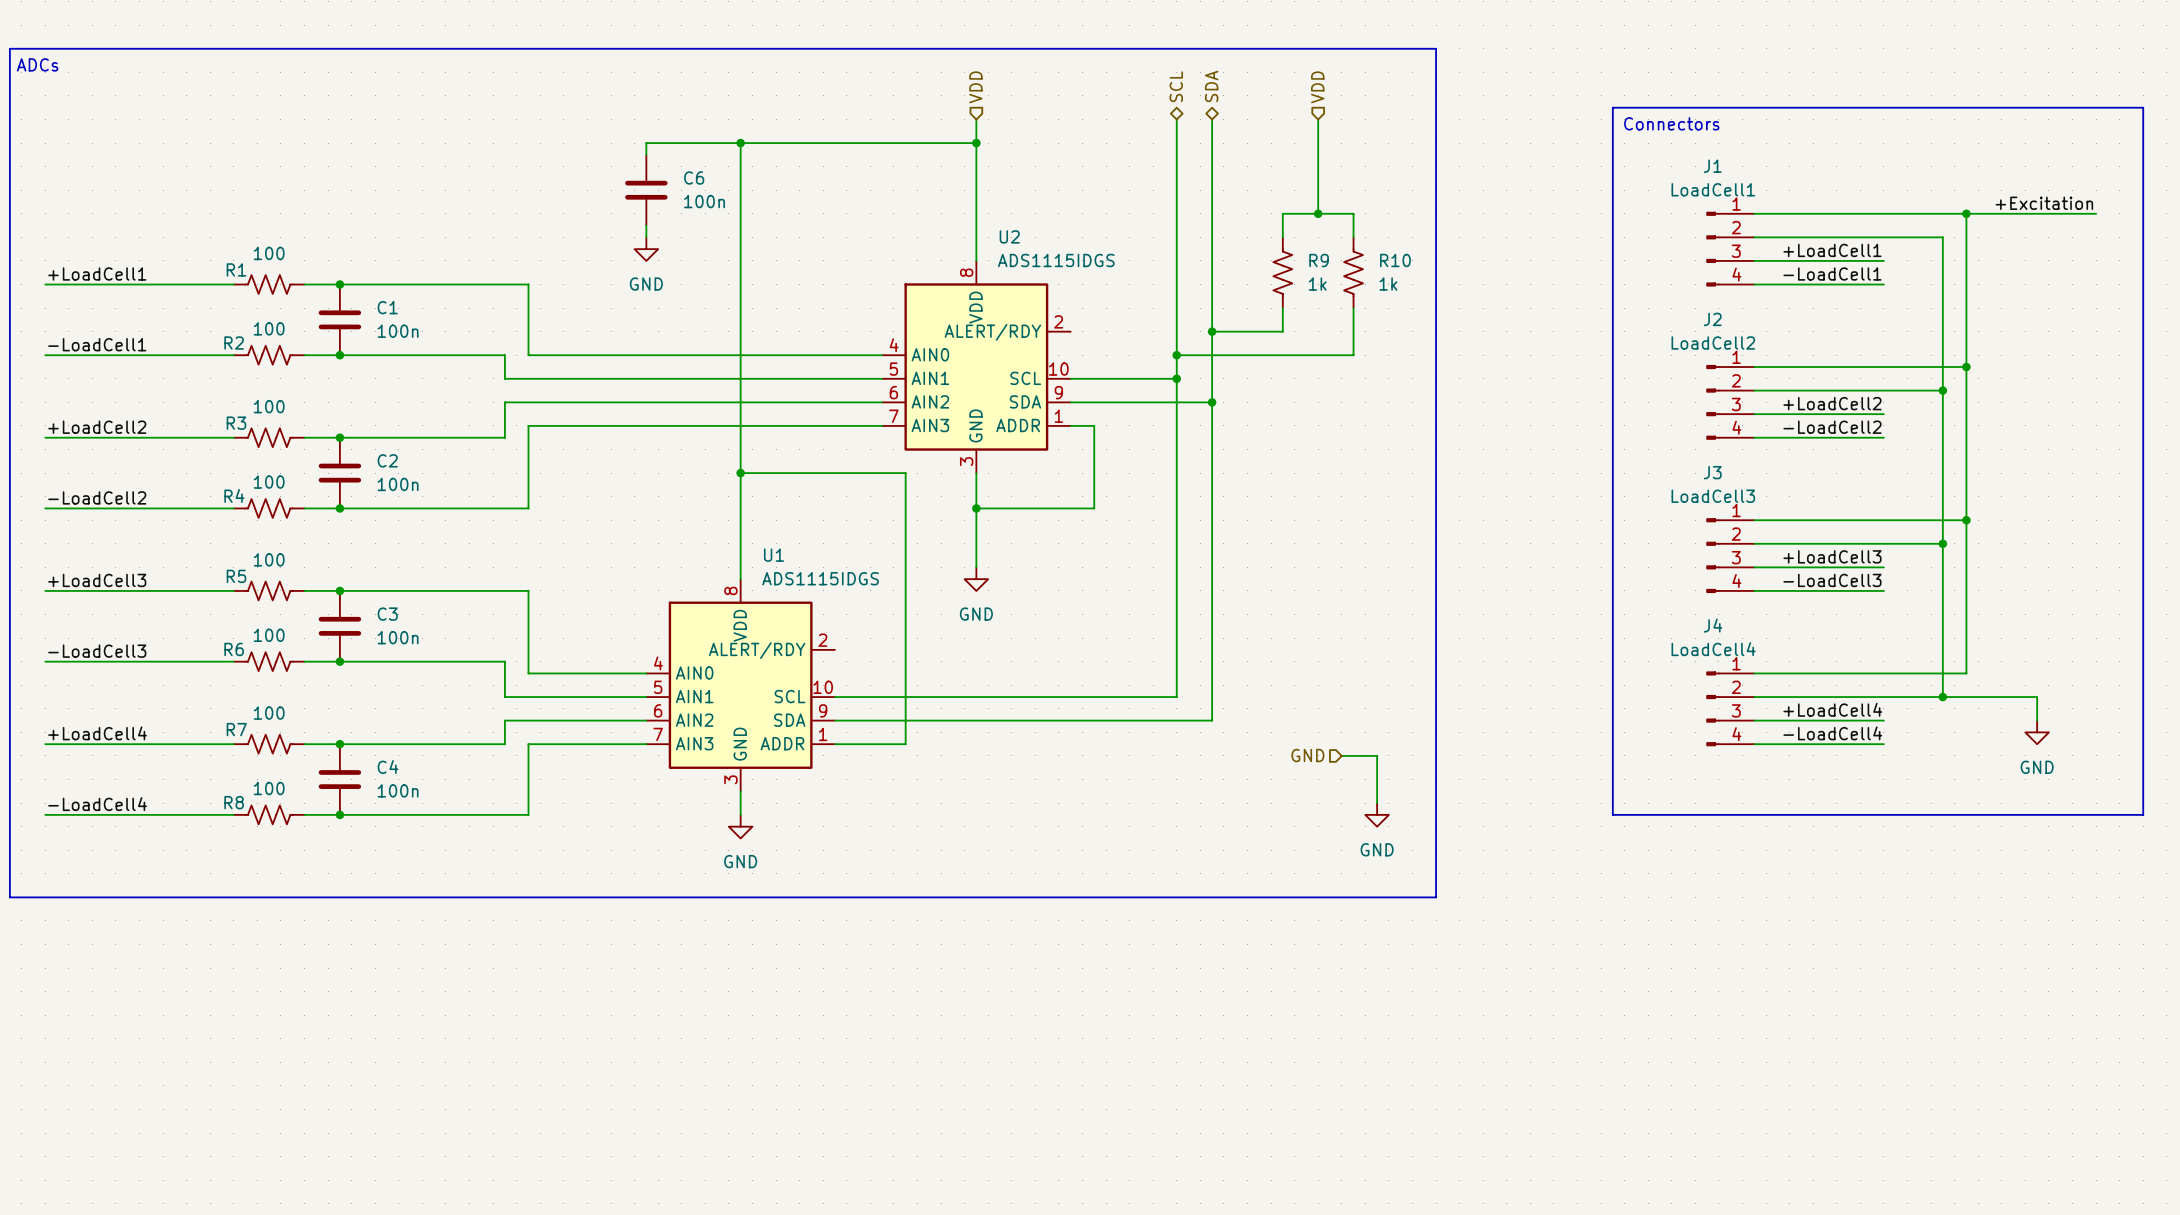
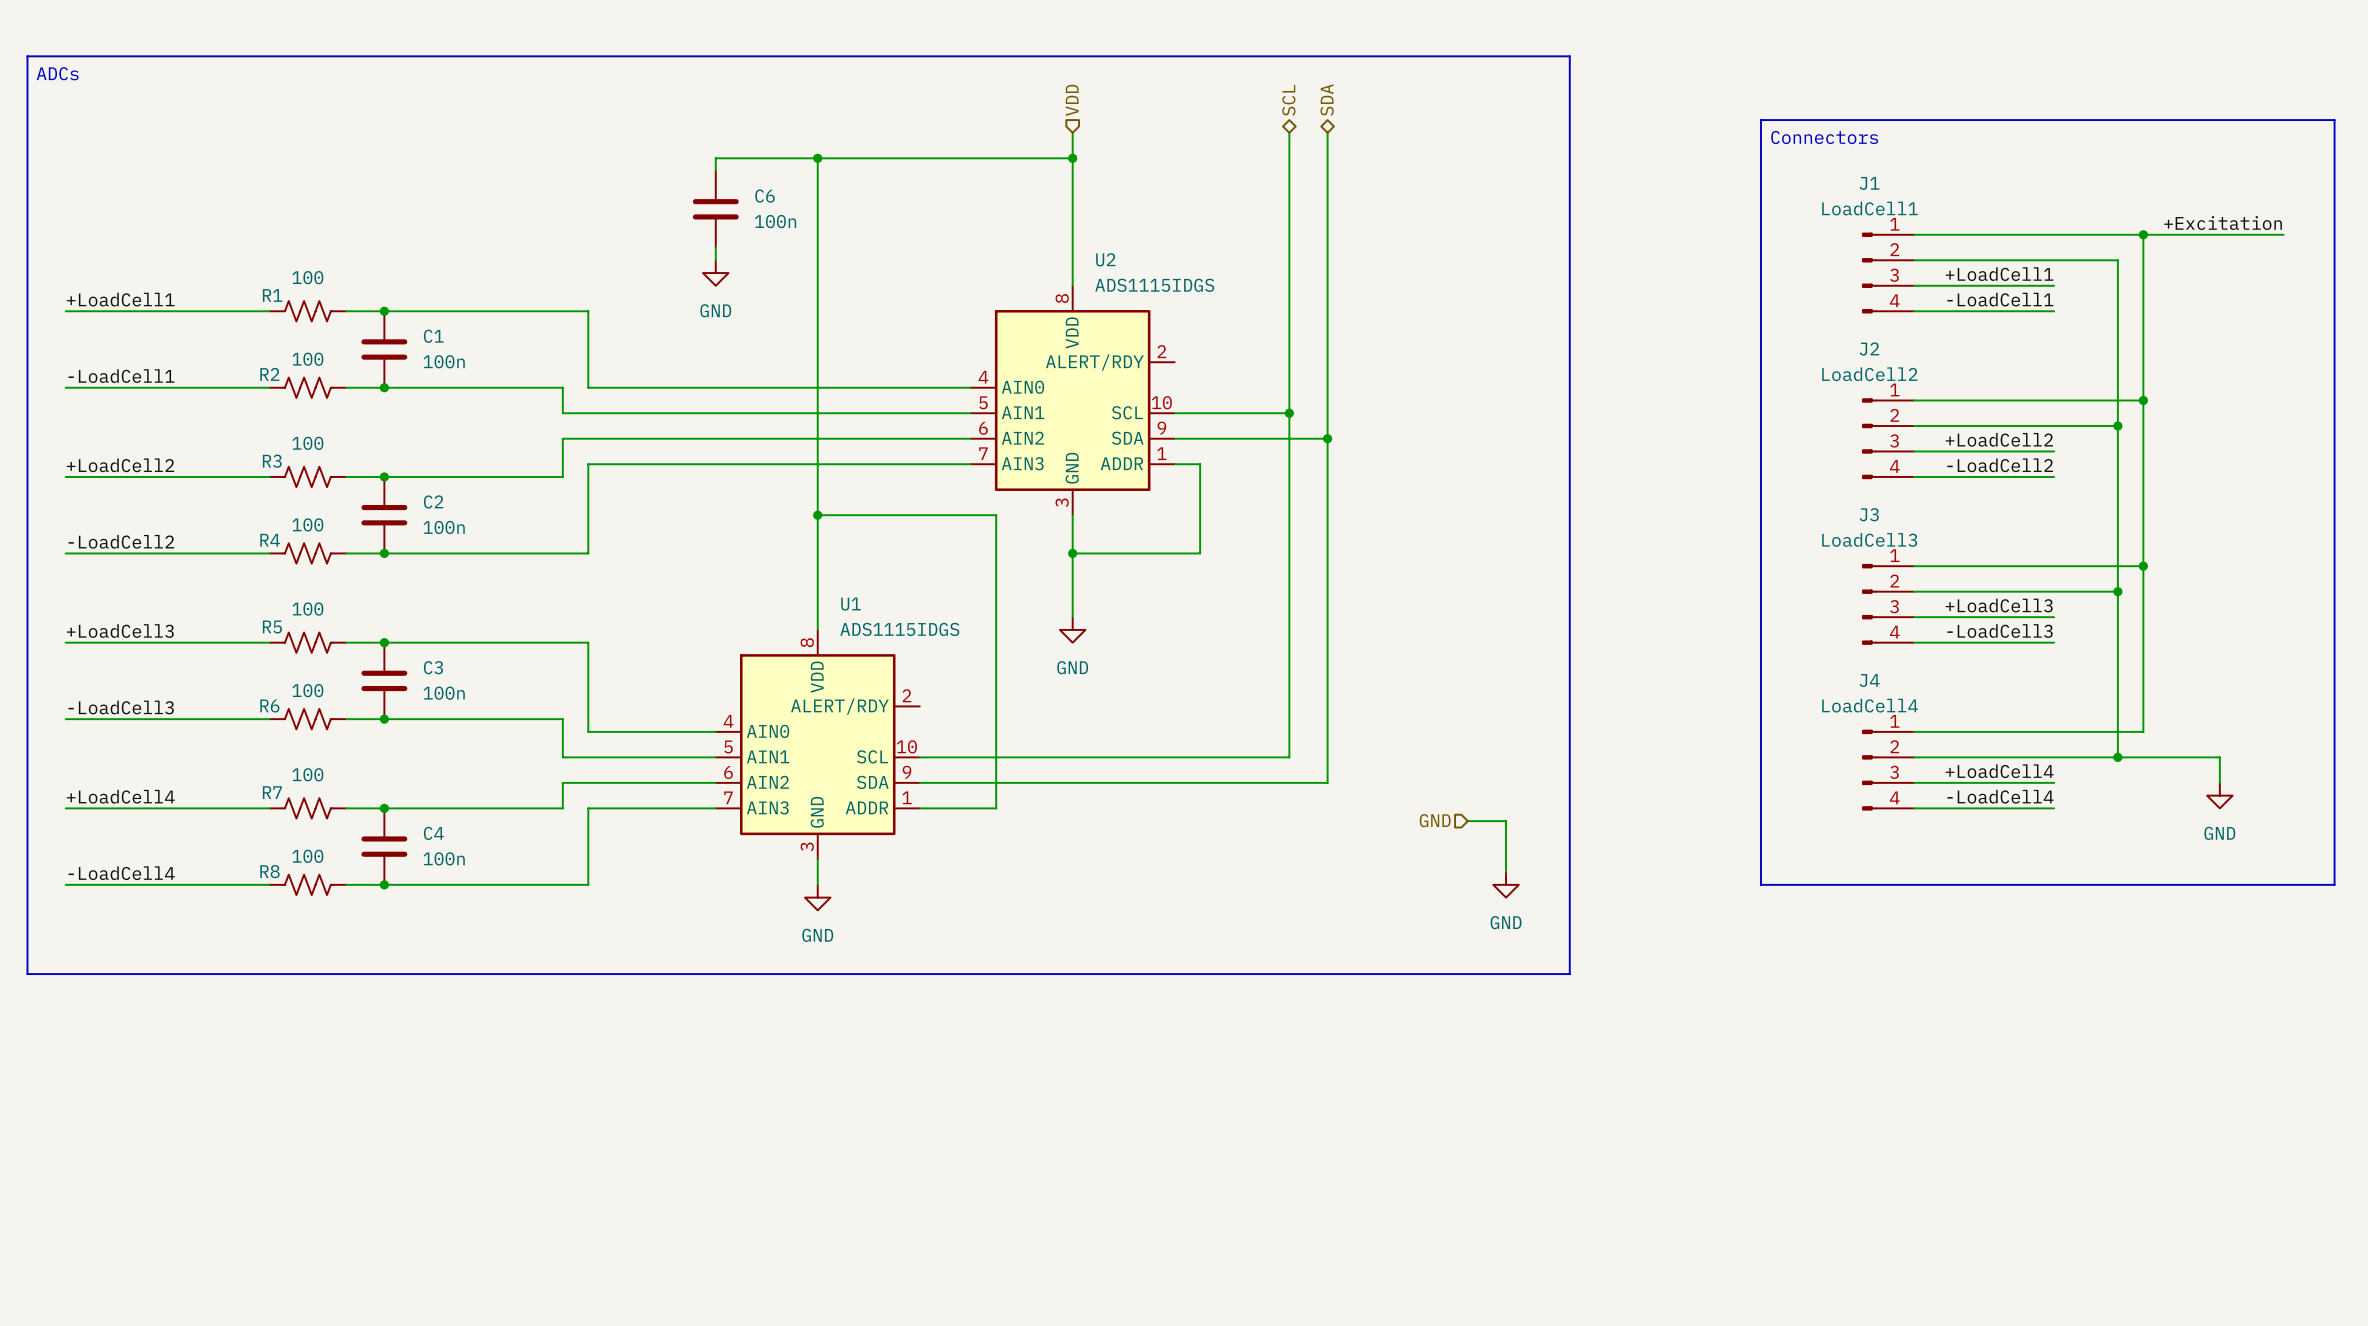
hierarchical label: VDD (1317, 87) -> none
wire: (1318, 119) (1318, 213) -> none
junction: (1318, 213) -> none
wire: (1282, 237) (1282, 213) (1353, 213) (1353, 237) -> none
R9: 1k (1282, 272) -> none
R10: 1k (1353, 272) -> none
wire: (1282, 308) (1282, 331) (1212, 331) -> none
wire: (1353, 308) (1353, 355) (1176, 355) -> none
junction: (1212, 331) -> none
junction: (1176, 355) -> none

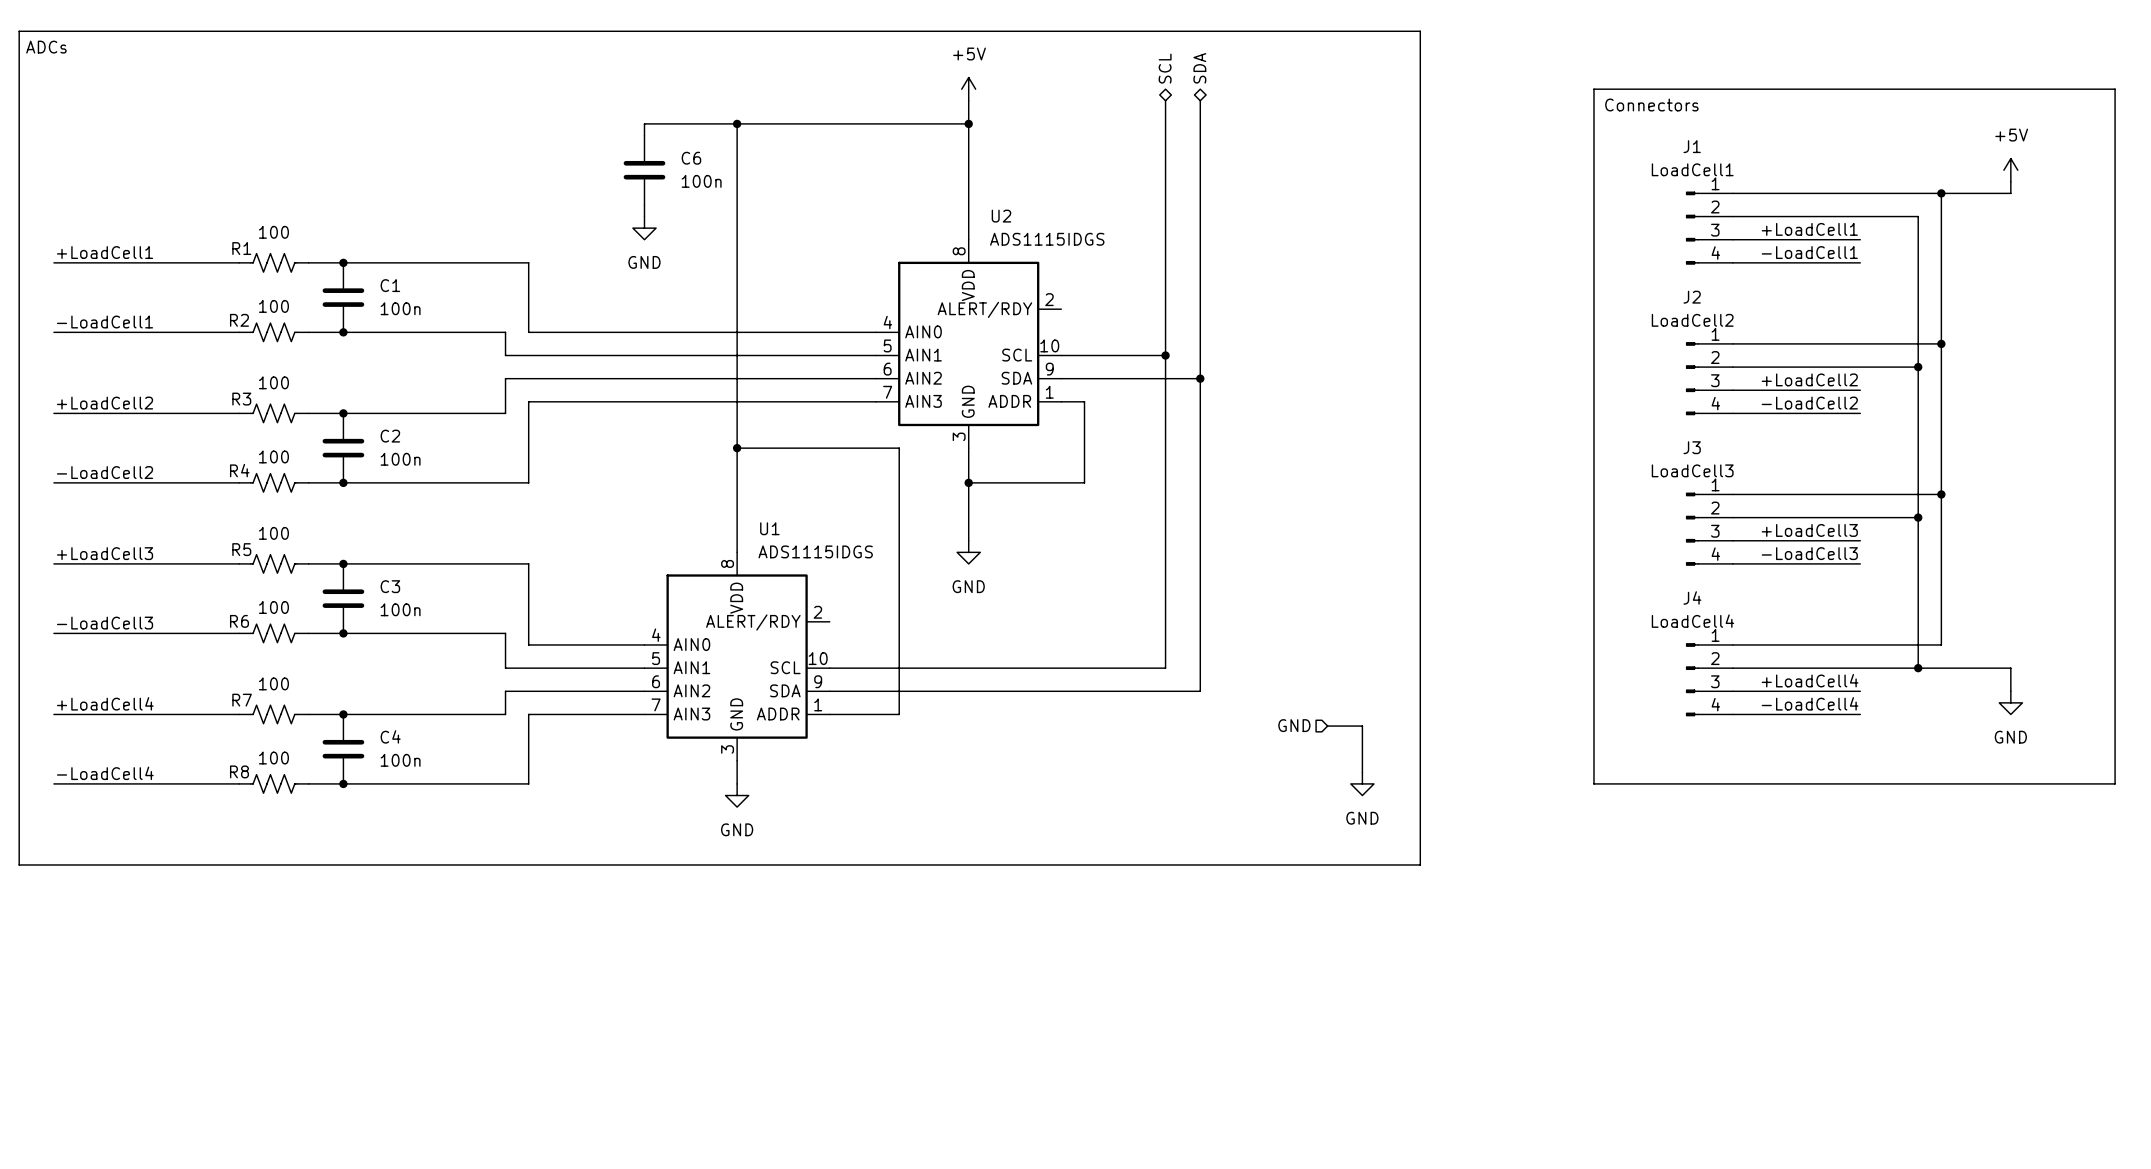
hierarchical label: VDD (1072, 100) -> none
power symbol: none -> +5V (968, 89)
power symbol: none -> +5V (2010, 170)
label: +Excitation (2223, 223) -> none
wire: (2219, 234) (2283, 234) -> (2010, 193) (2010, 181)

